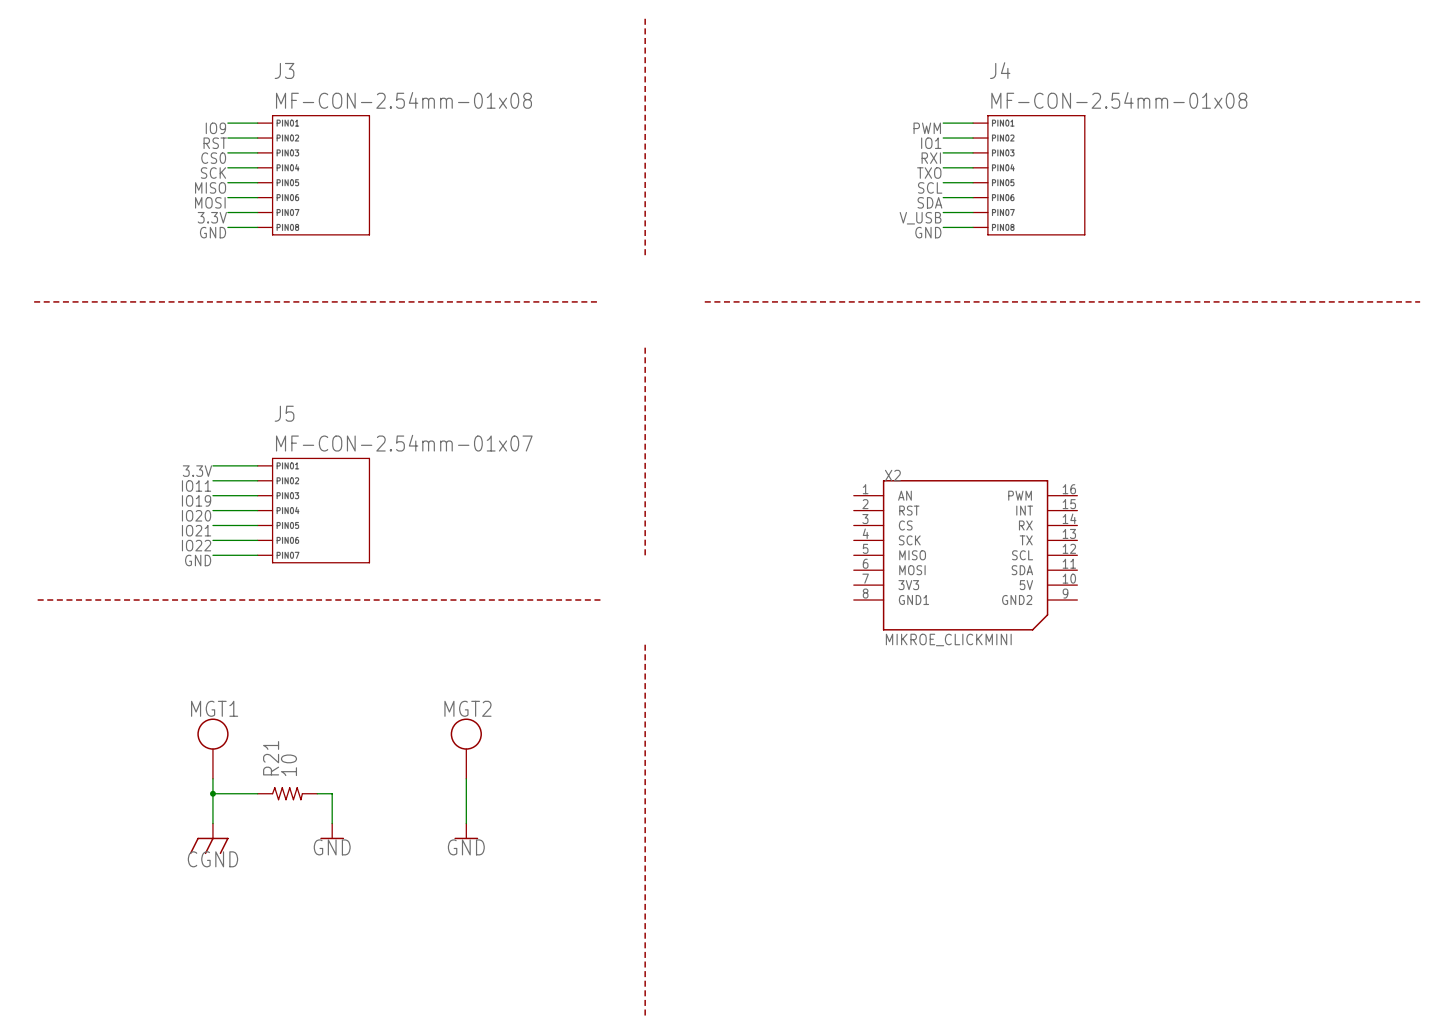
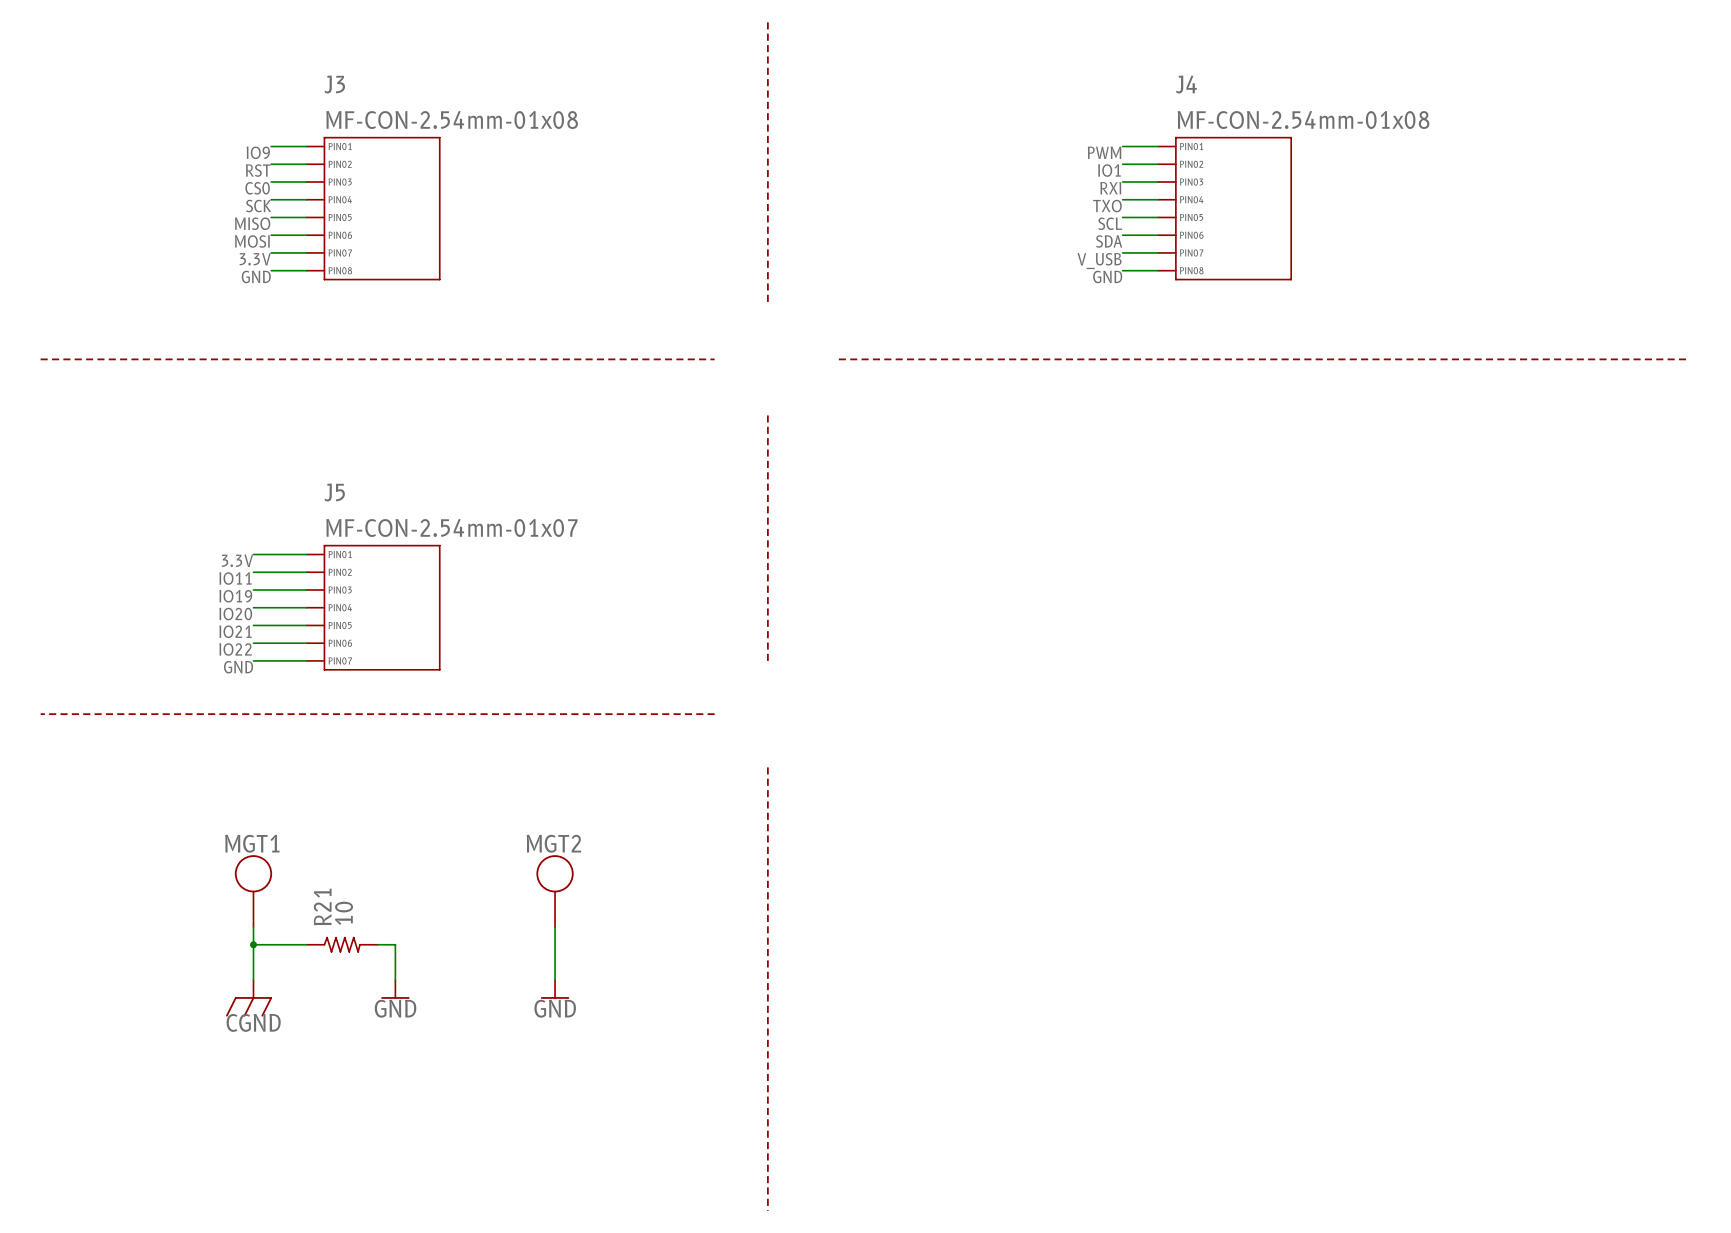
X2: MIKROE_CLICKMINI (965, 555) -> none

